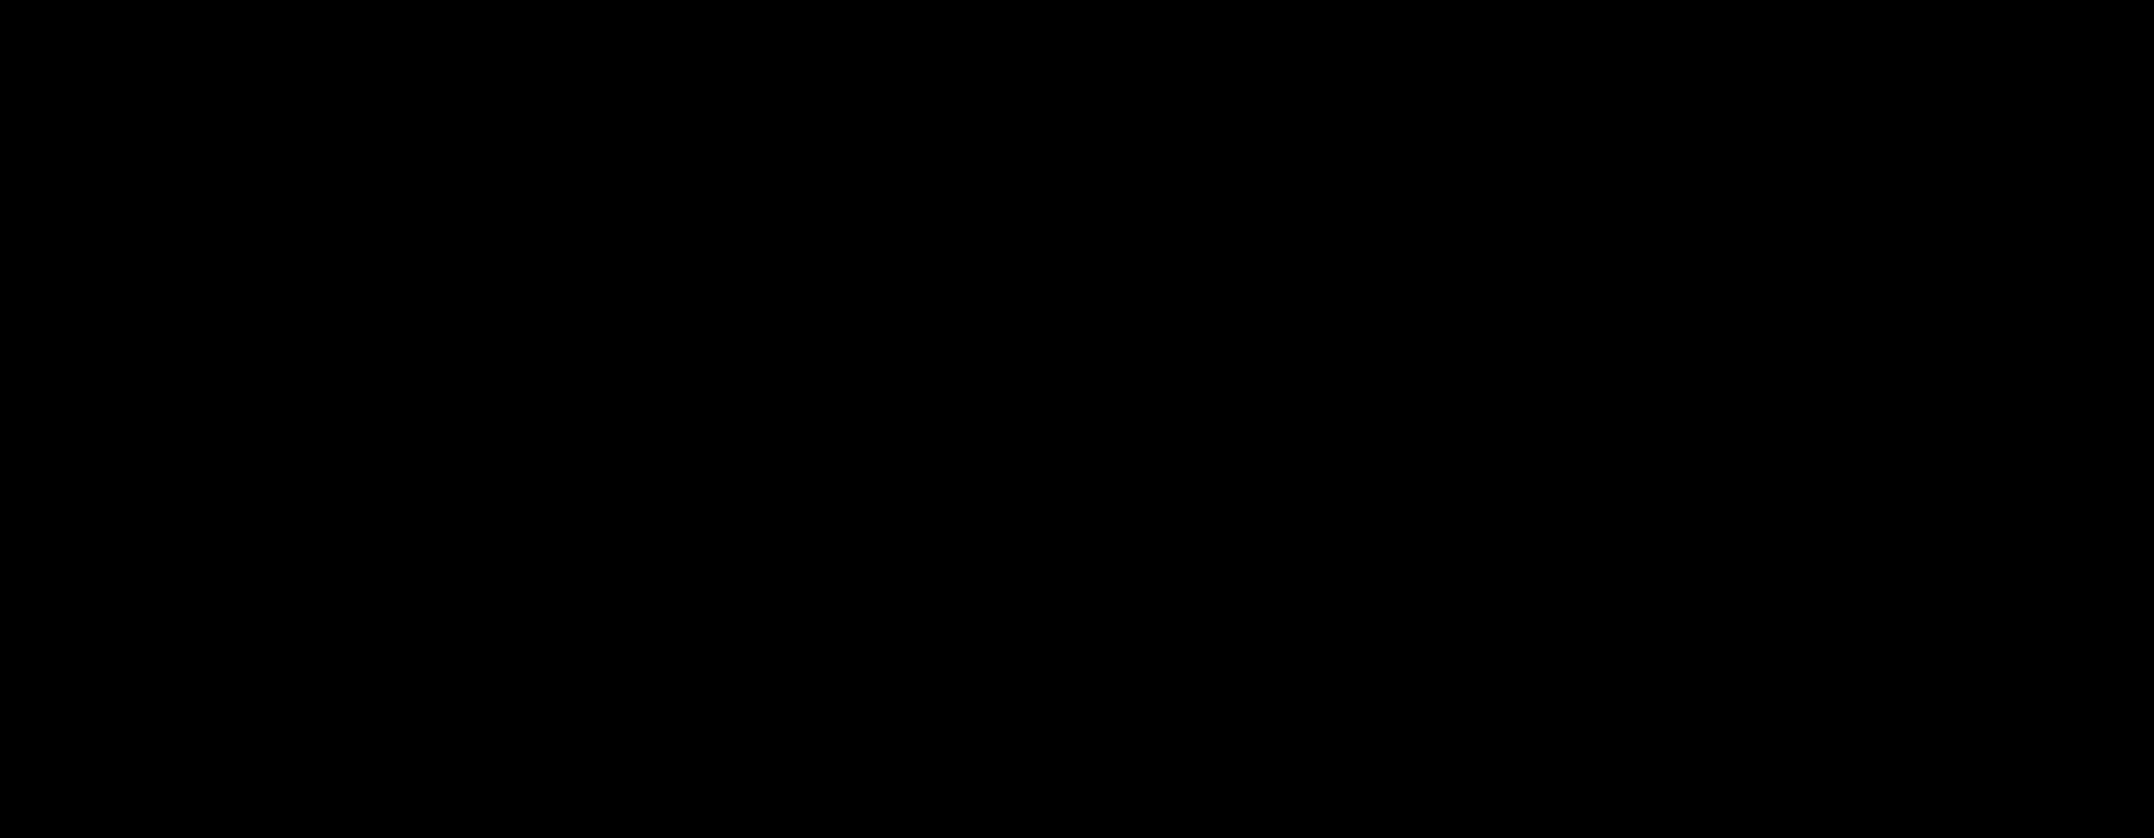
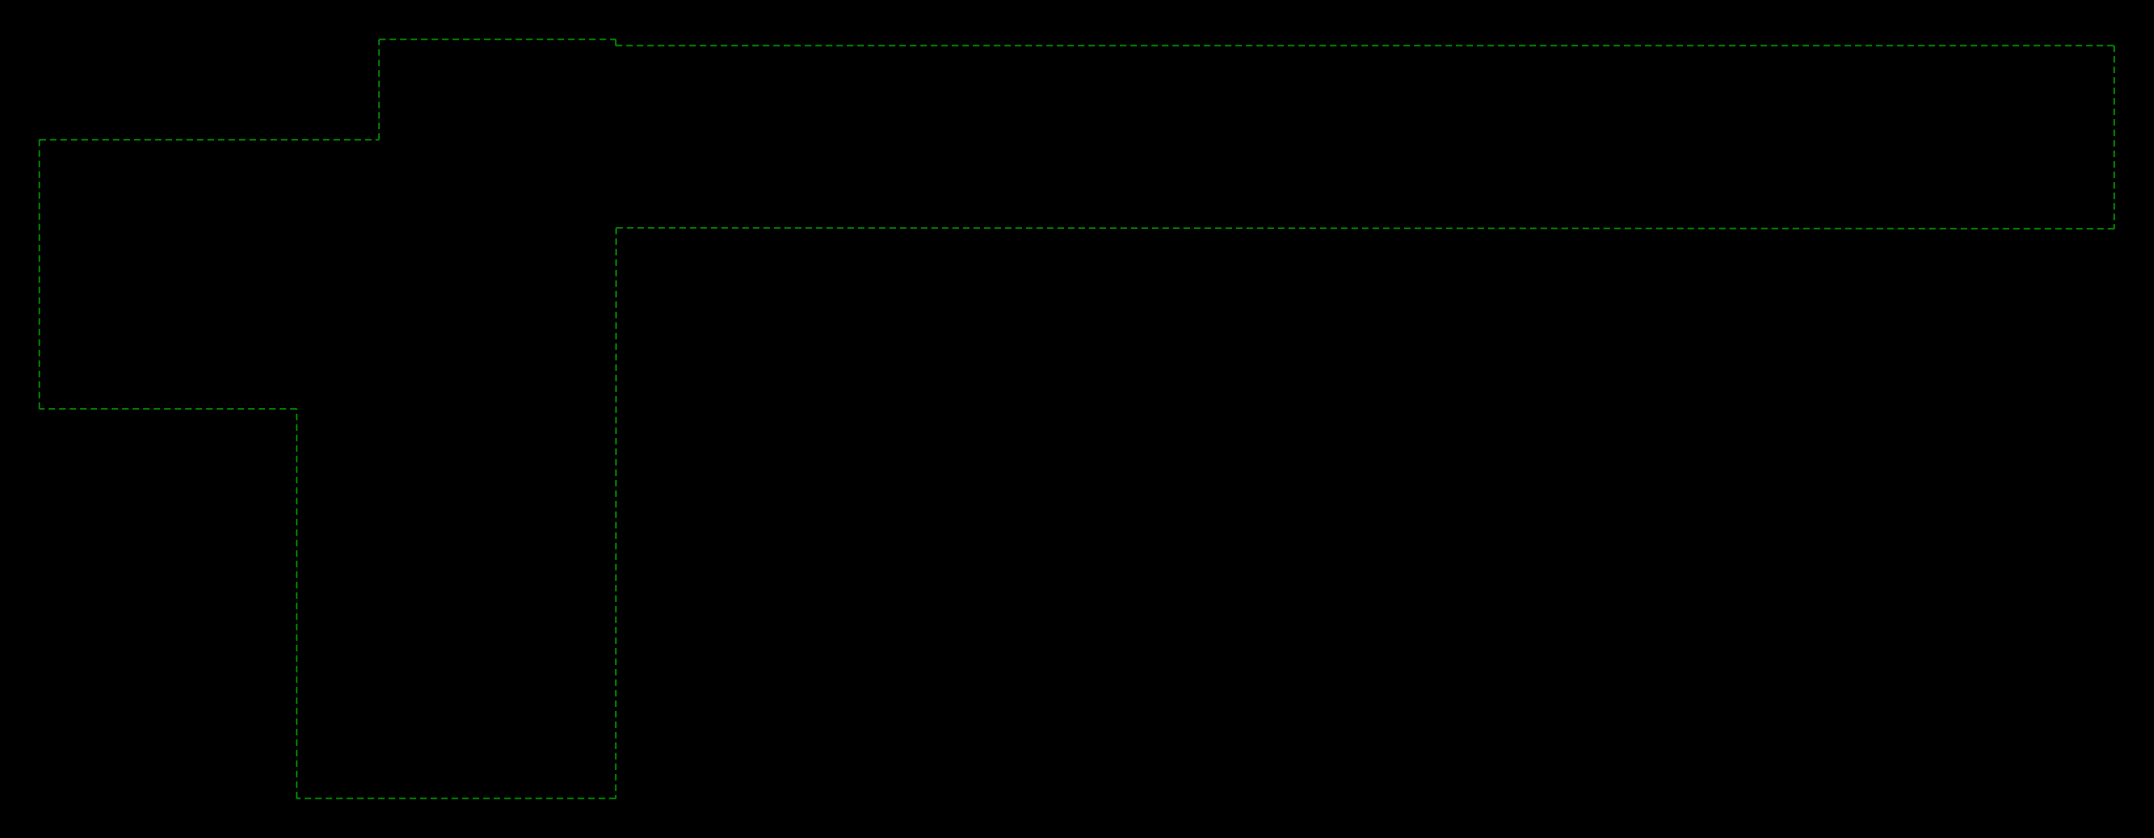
bottom zone outline: none -> (379, 39) (615, 39) (615, 45) (2114, 45) (2114, 228) (616, 227) (615, 798) (296, 798) (296, 408) (39, 408) (39, 139) (379, 139) (379, 39)

